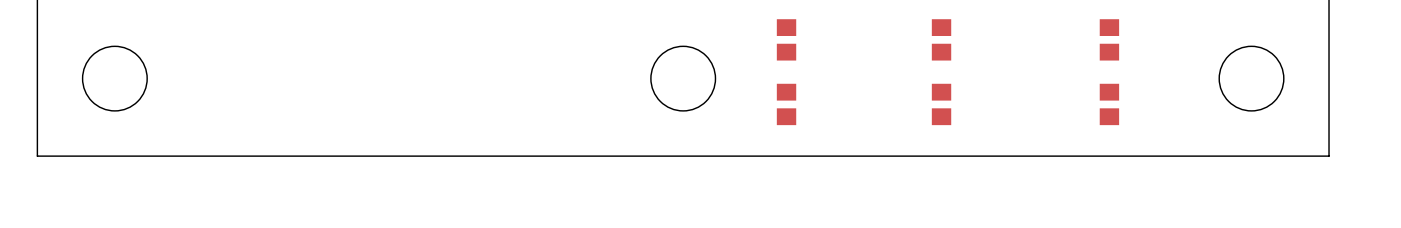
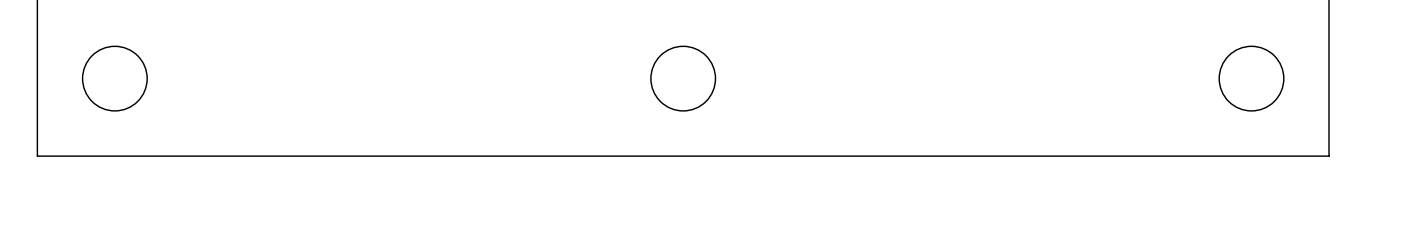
part: (786, 39) -> none
part: (941, 39) -> none
part: (1109, 39) -> none
part: (786, 104) -> none
part: (941, 104) -> none
part: (1109, 104) -> none

